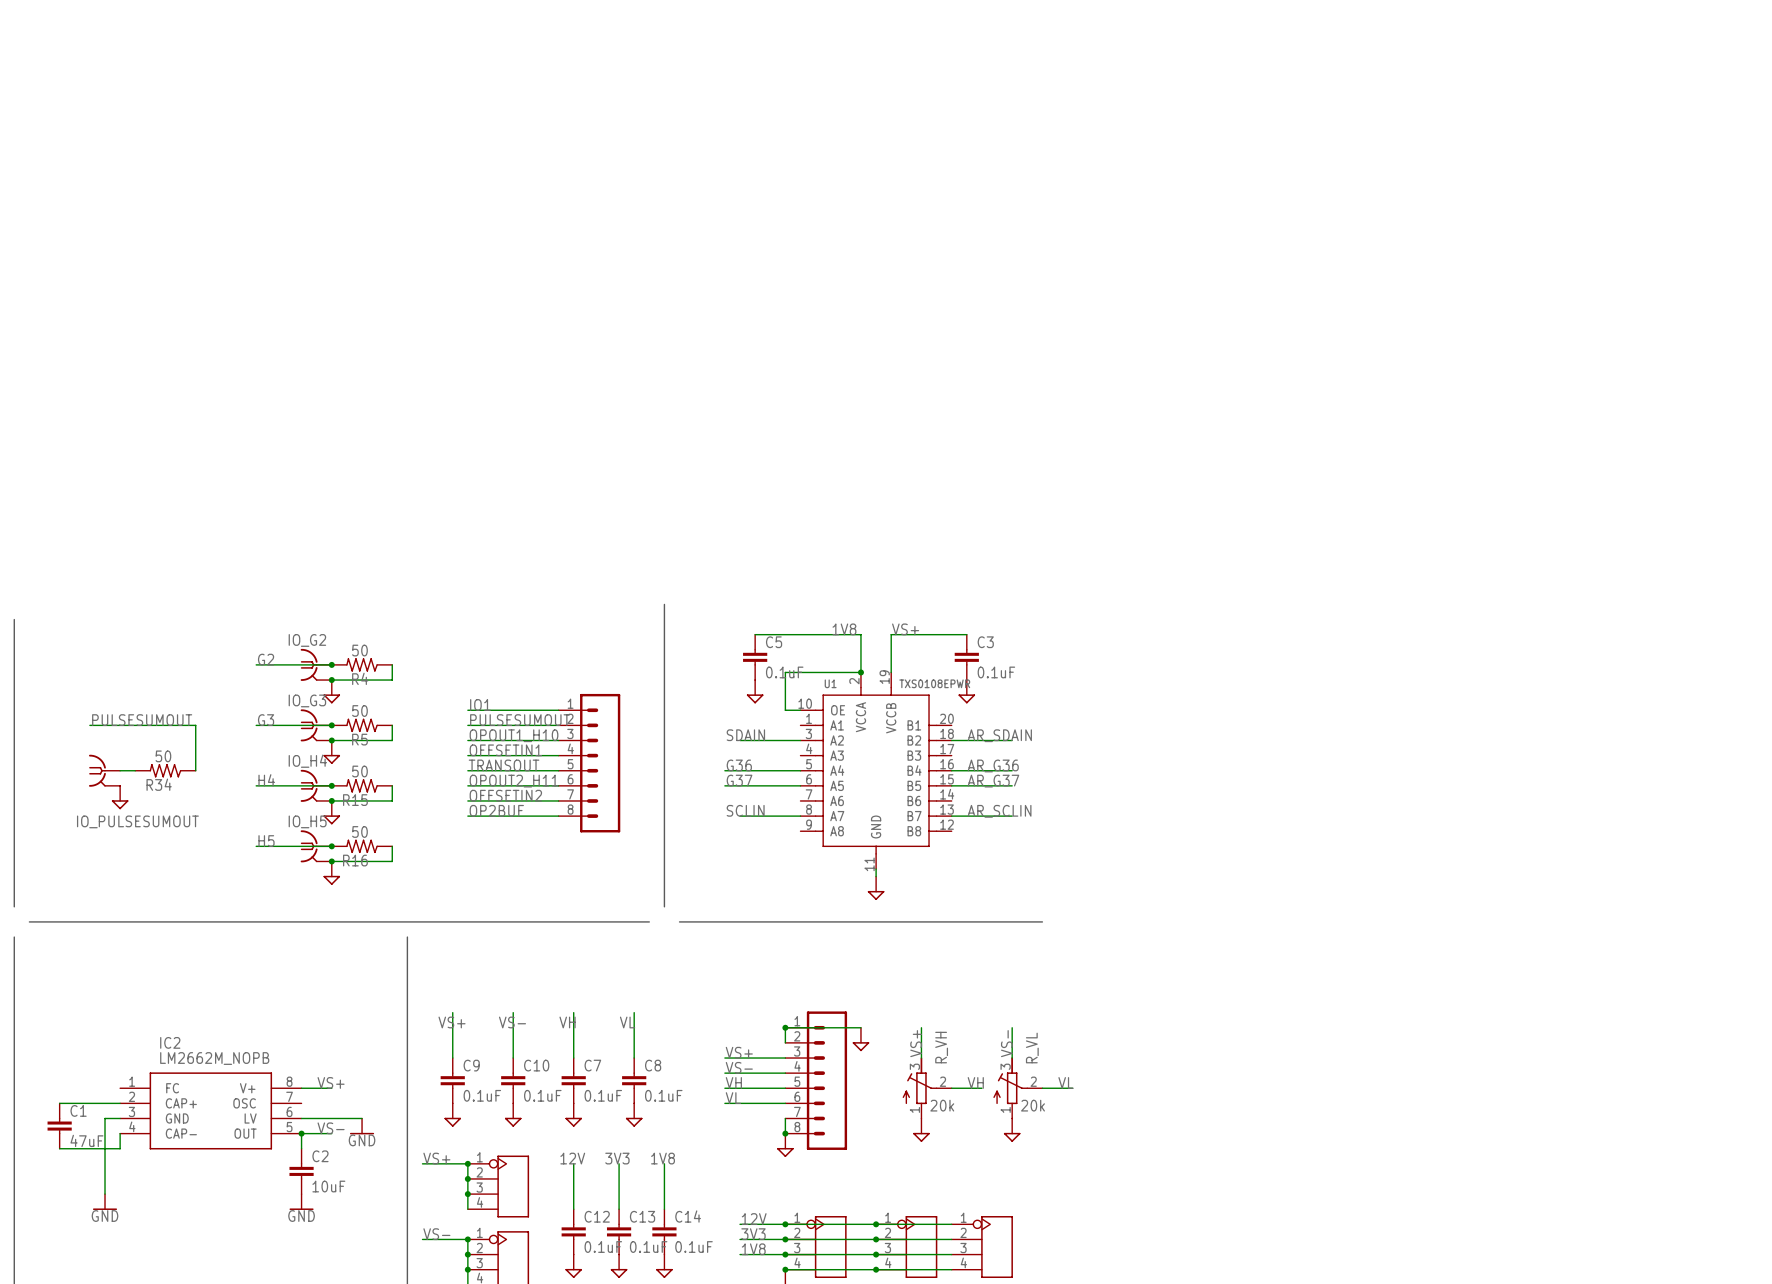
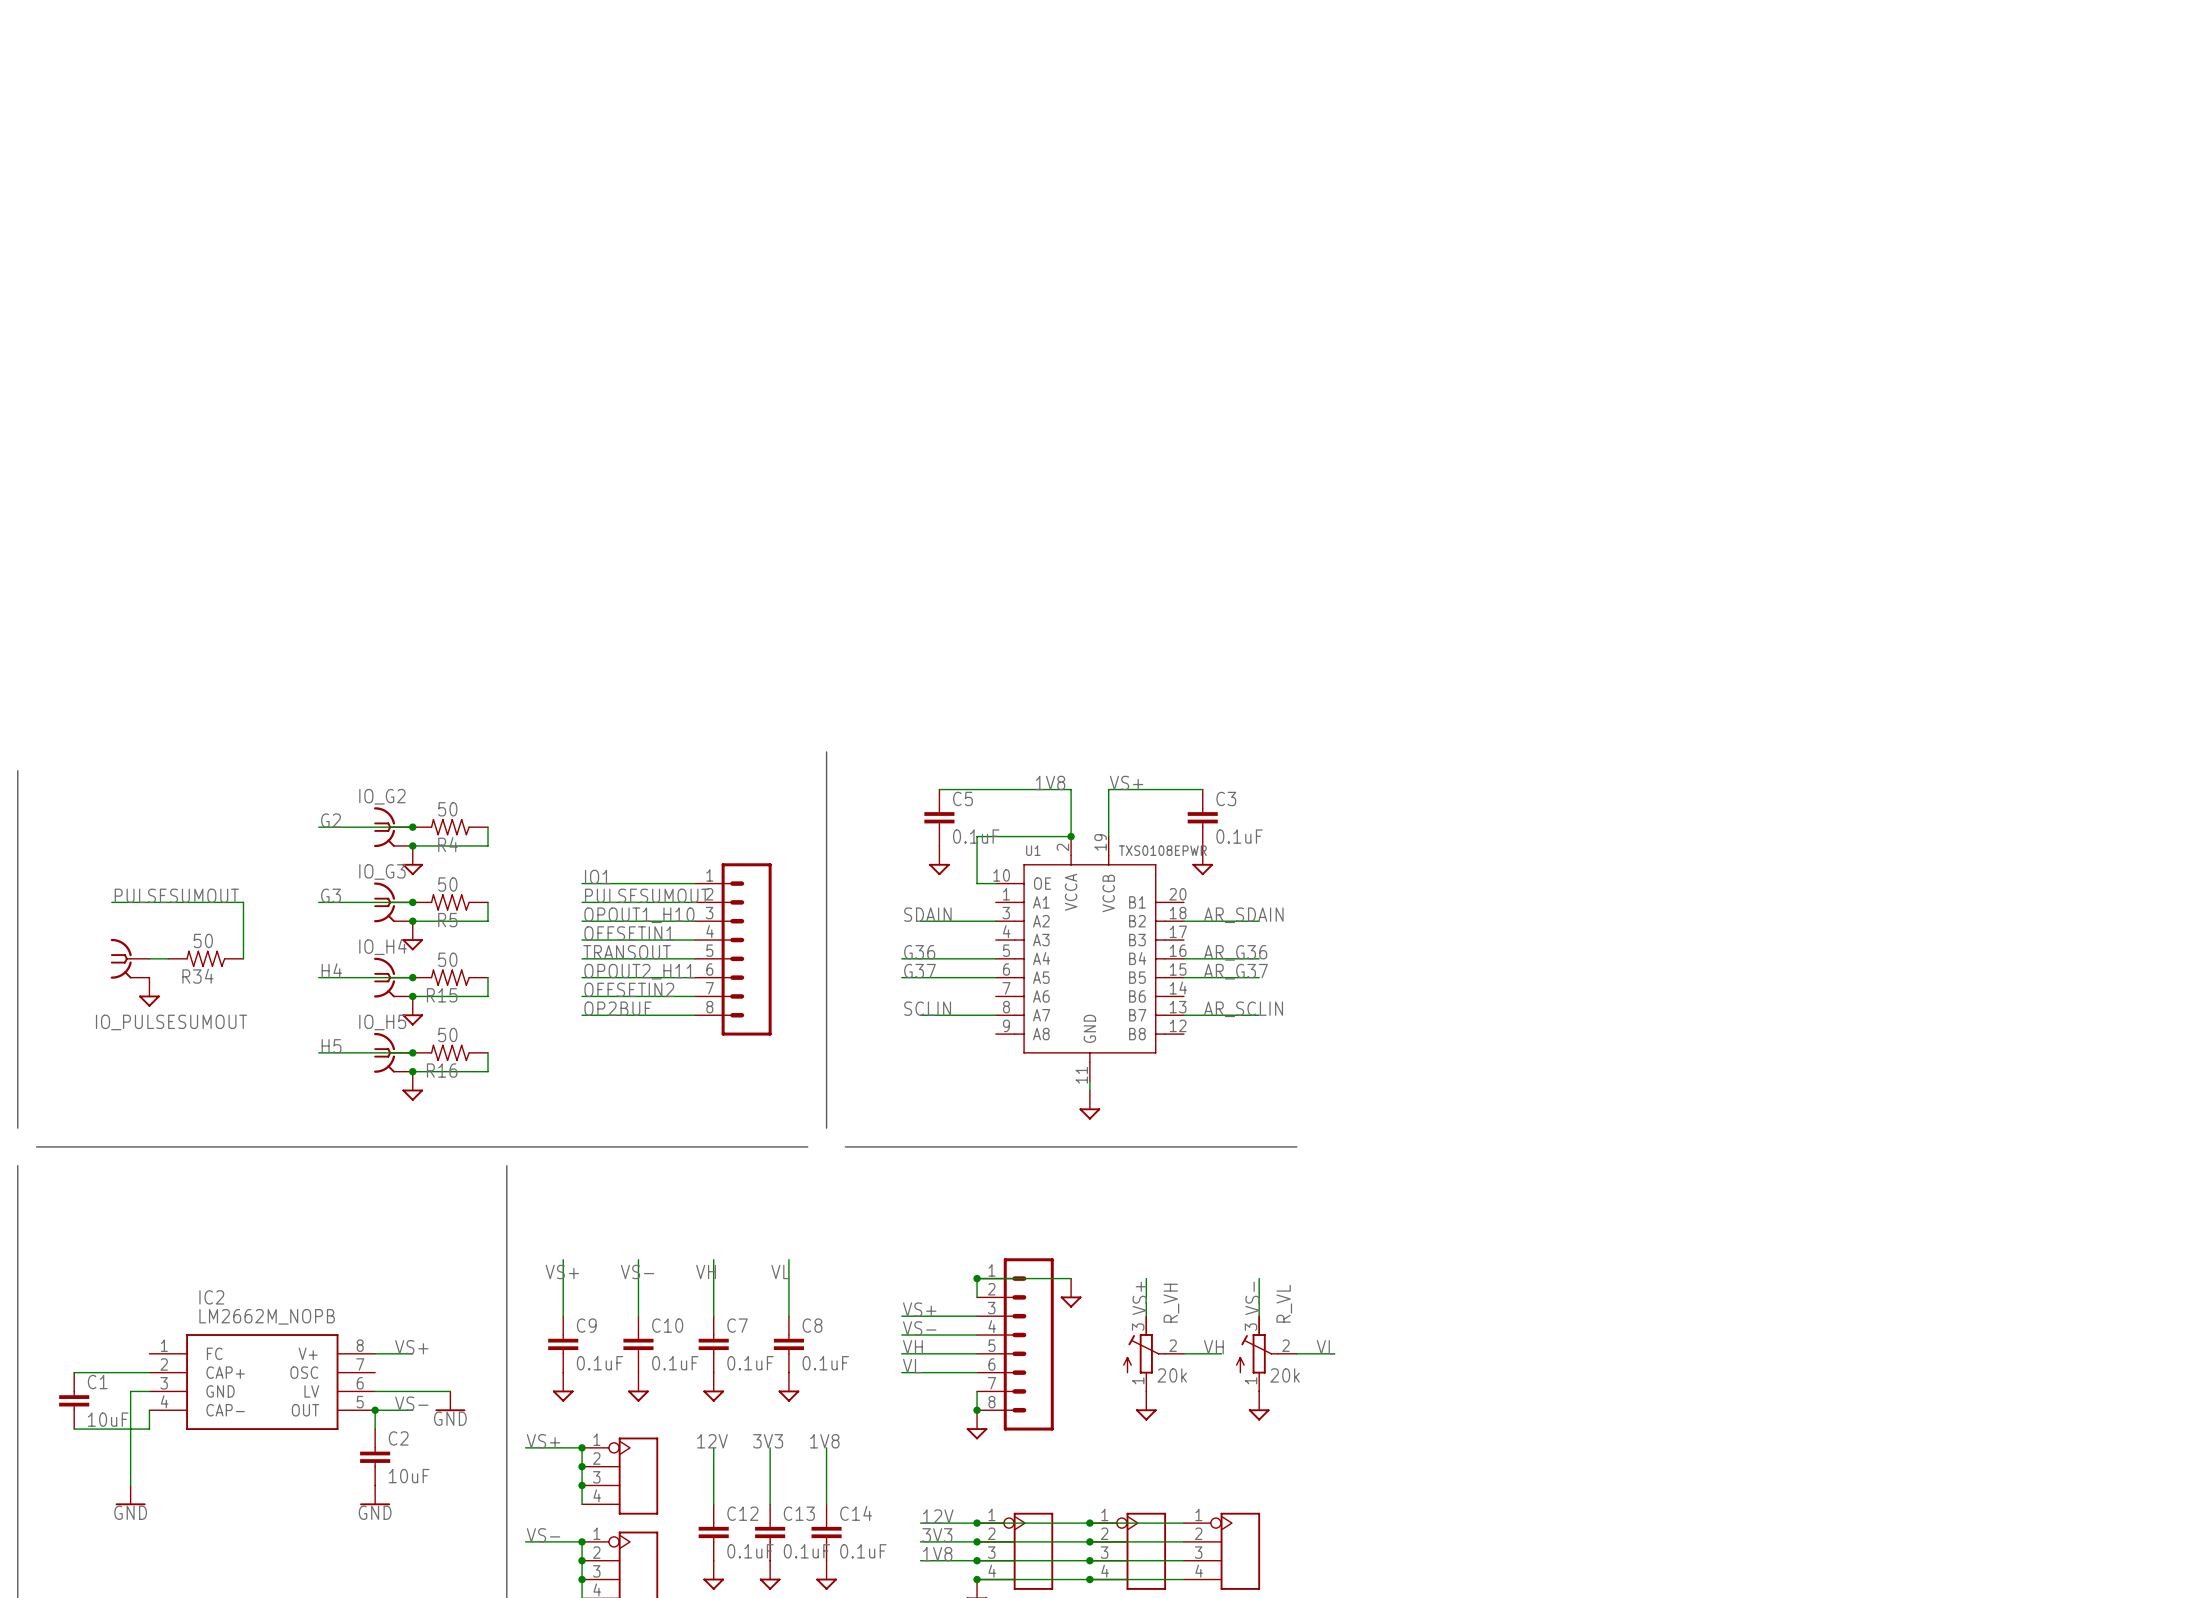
C1 value: 47uF (86, 1140) -> 10uF (108, 1419)

